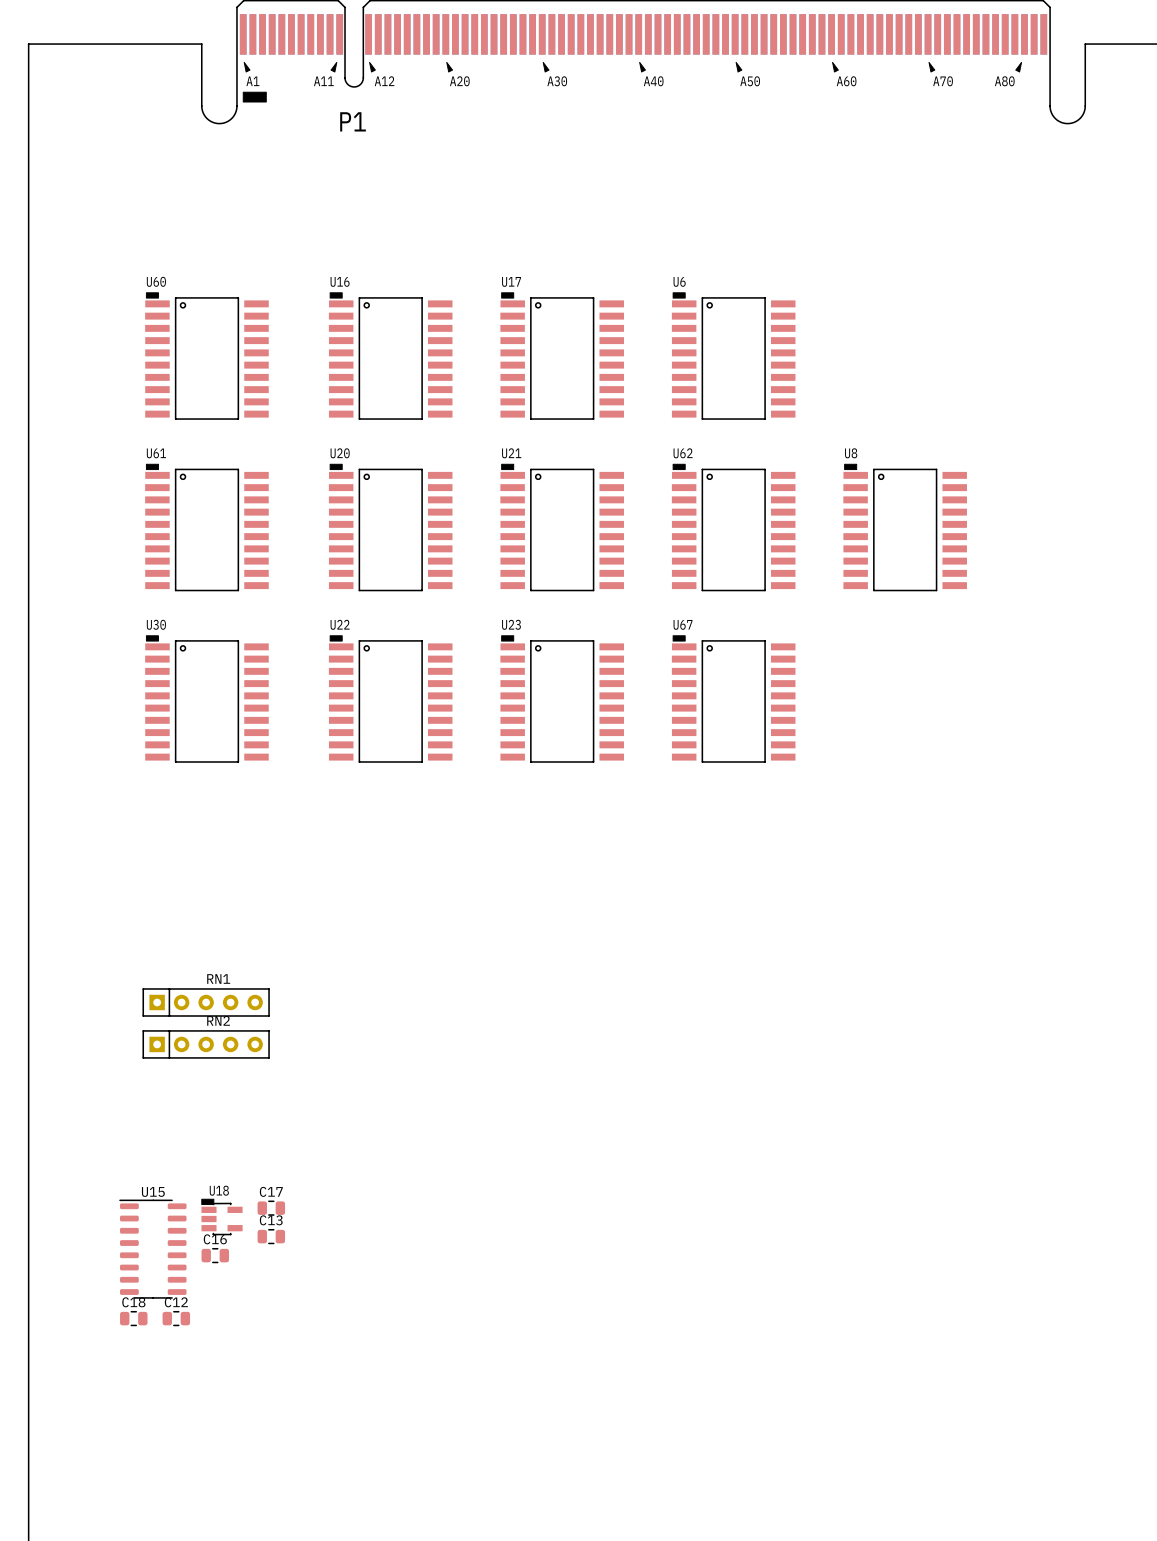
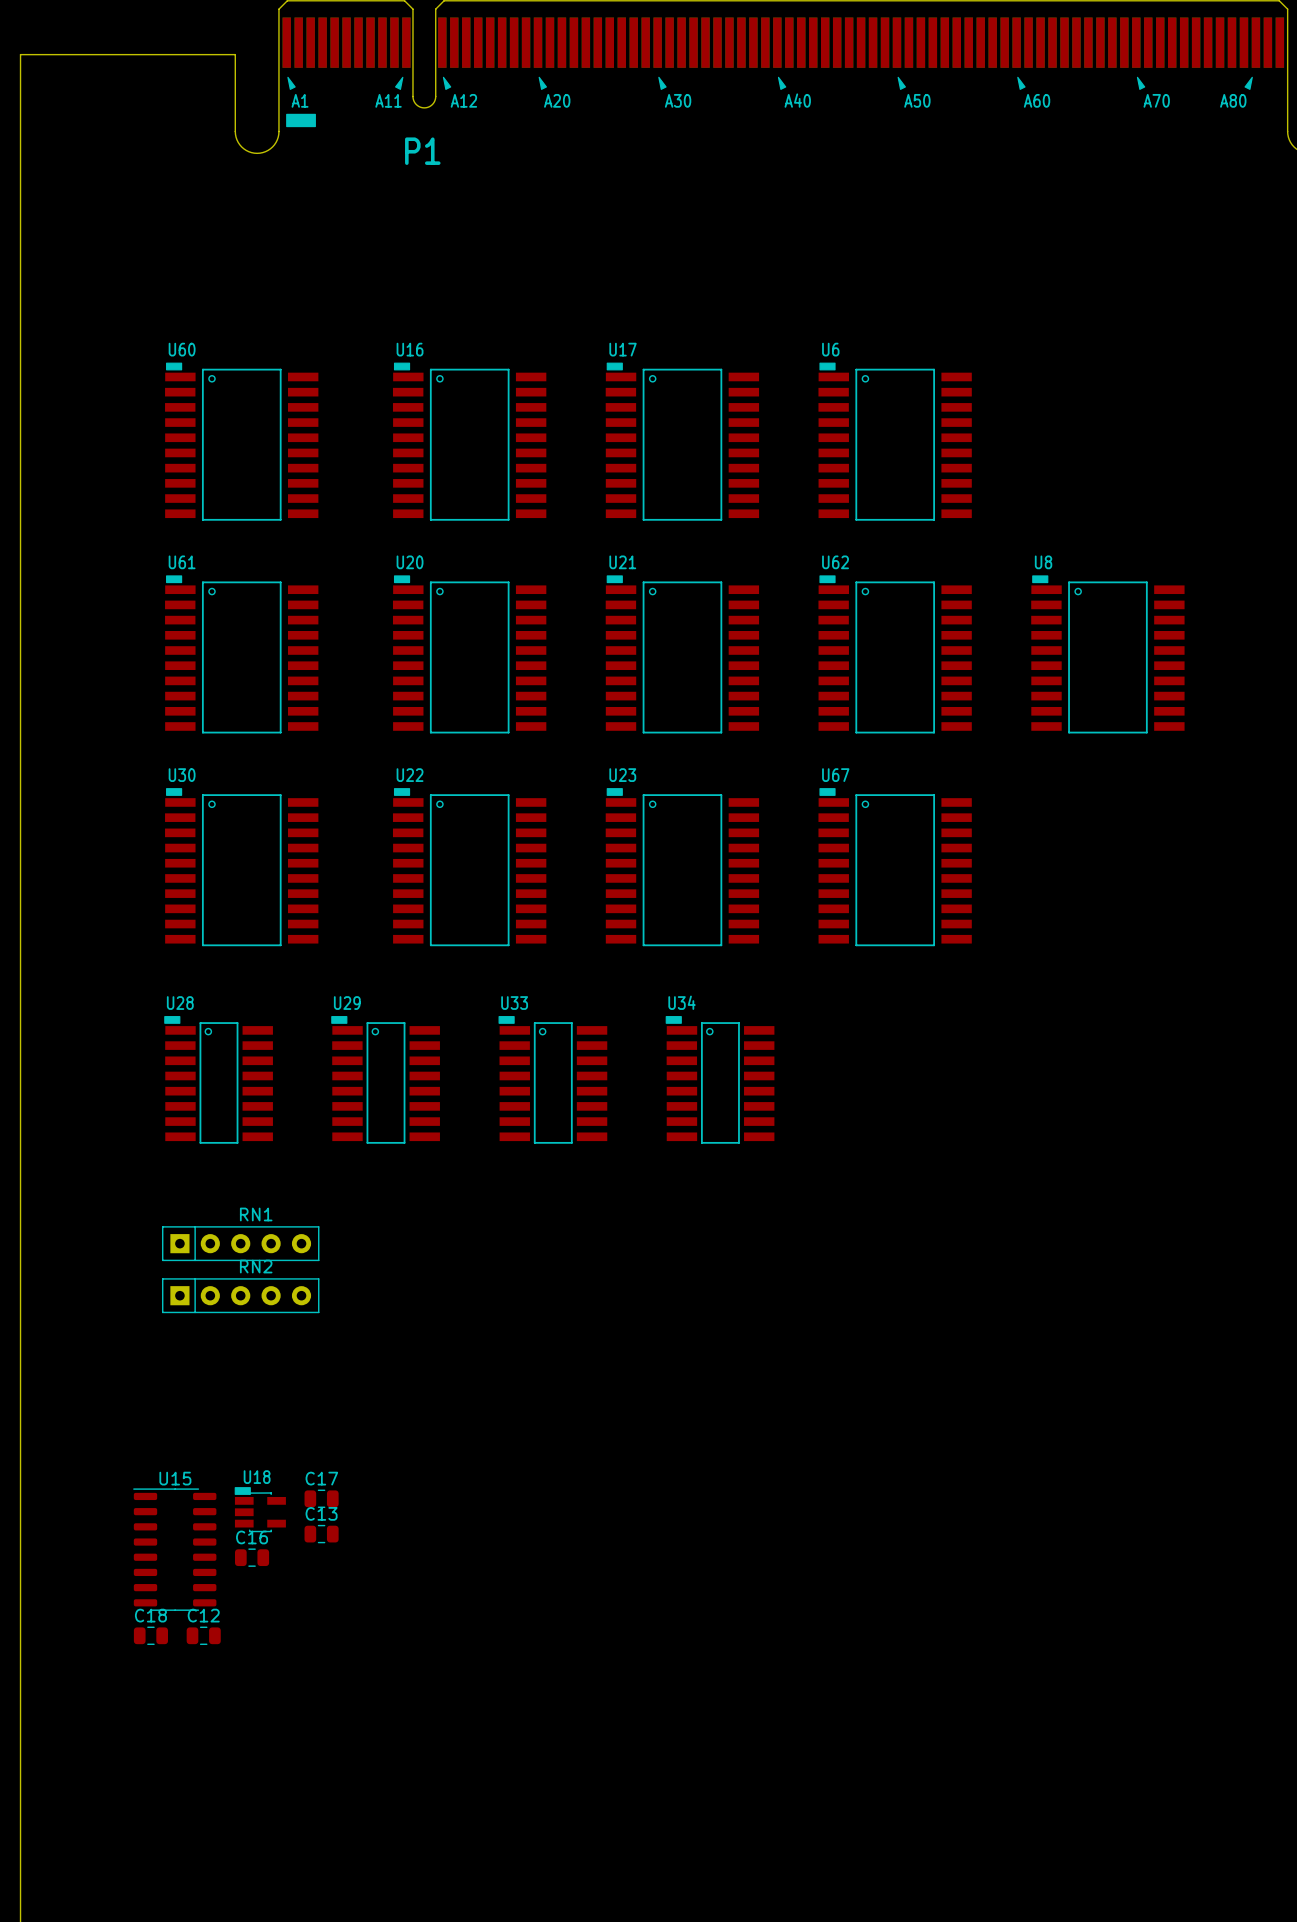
U28: none -> (218, 1079)
U29: none -> (385, 1079)
U33: none -> (552, 1079)
U34: none -> (720, 1079)

